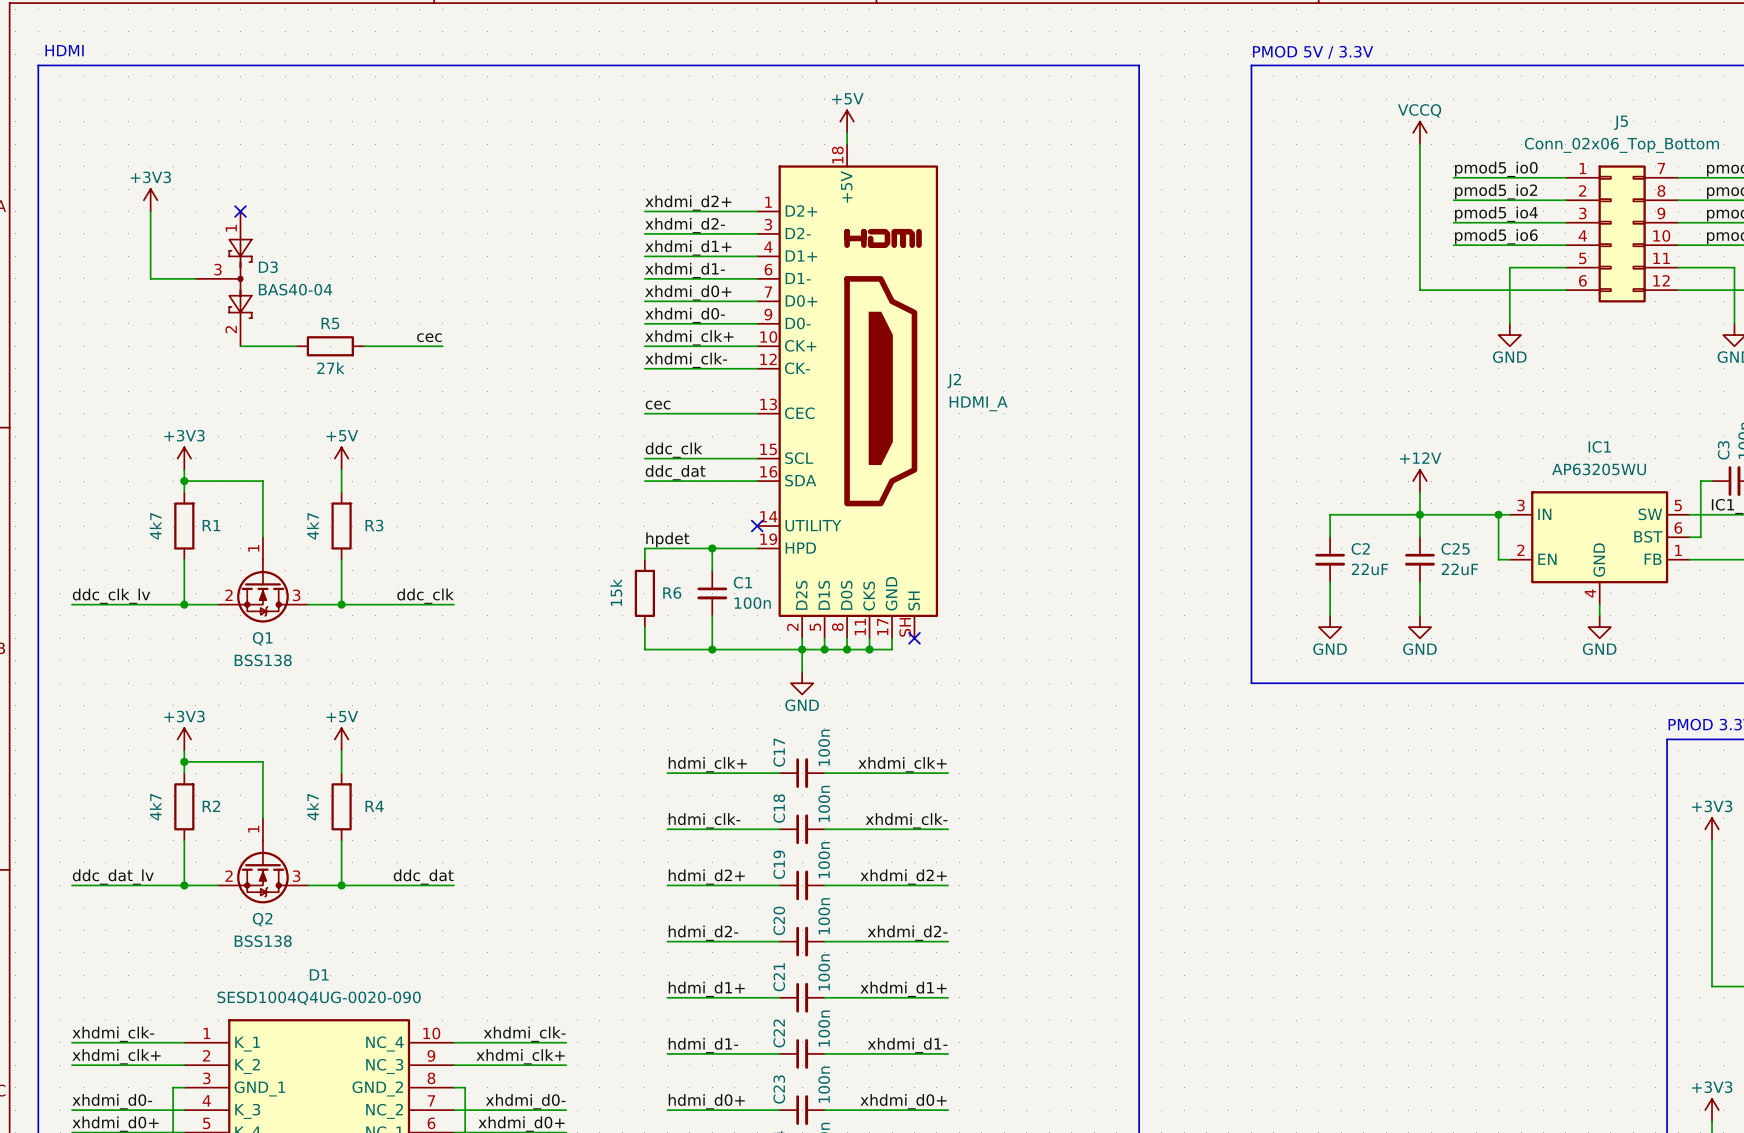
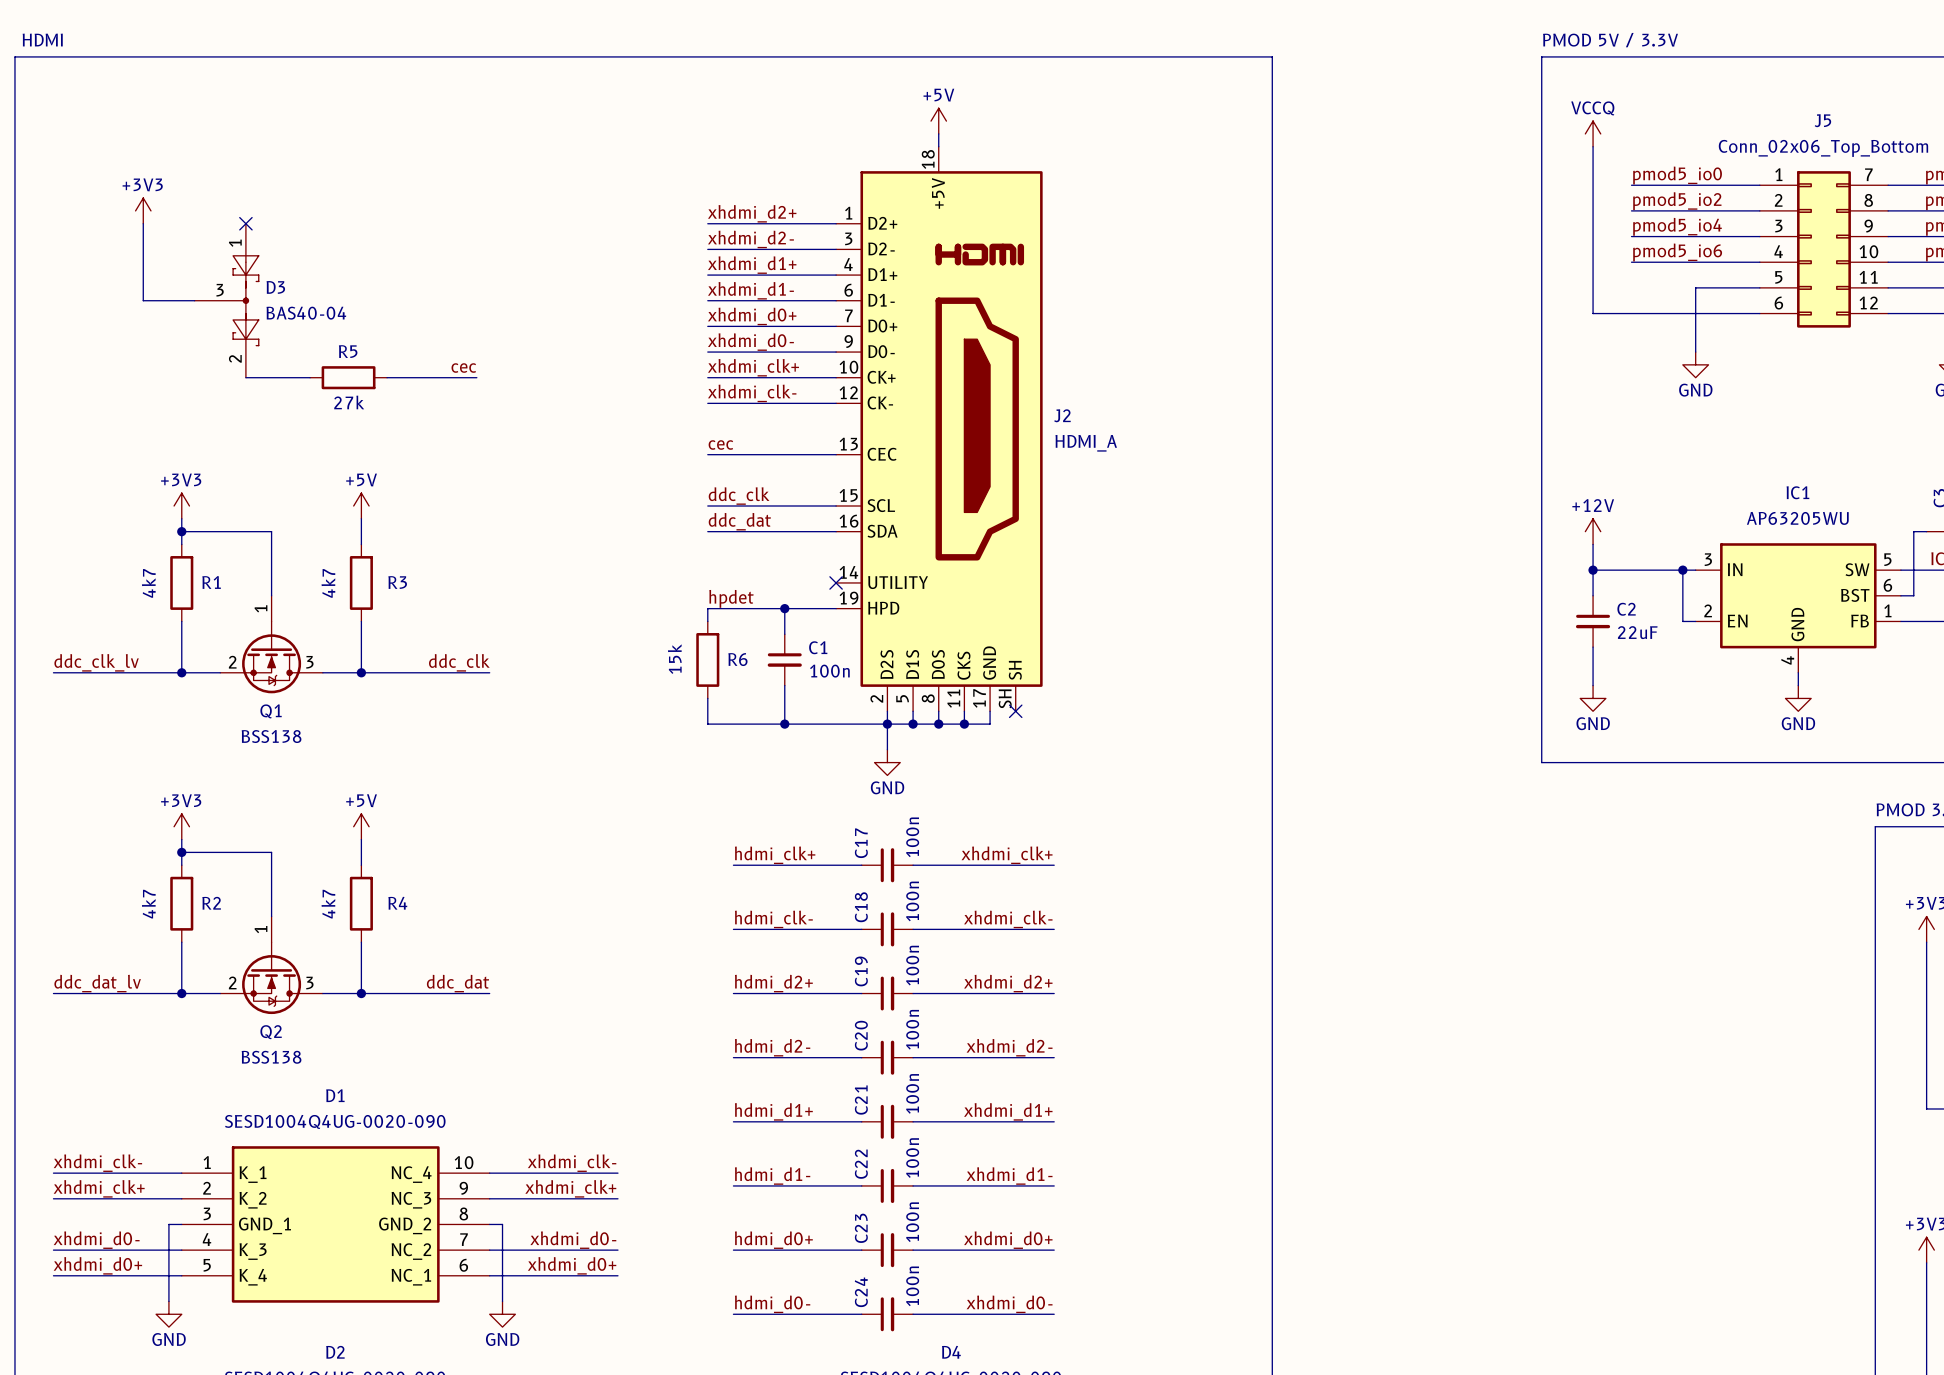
text position: PMOD 5V / 3.3V (1313, 52) -> PMOD 5V / 3.3V (1610, 40)
line: (1375, 65) (1251, 65) (1251, 683) (1375, 683) -> (1541, 56) (1541, 762)
wire: (1419, 514) (1330, 514) (1330, 537) -> none
C25 name: C25 (1455, 548) -> C2 (1626, 609)
C2: 22uF (1330, 559) -> none
wire: (1330, 582) (1330, 615) -> none
power symbol: GND (1330, 627) -> none

